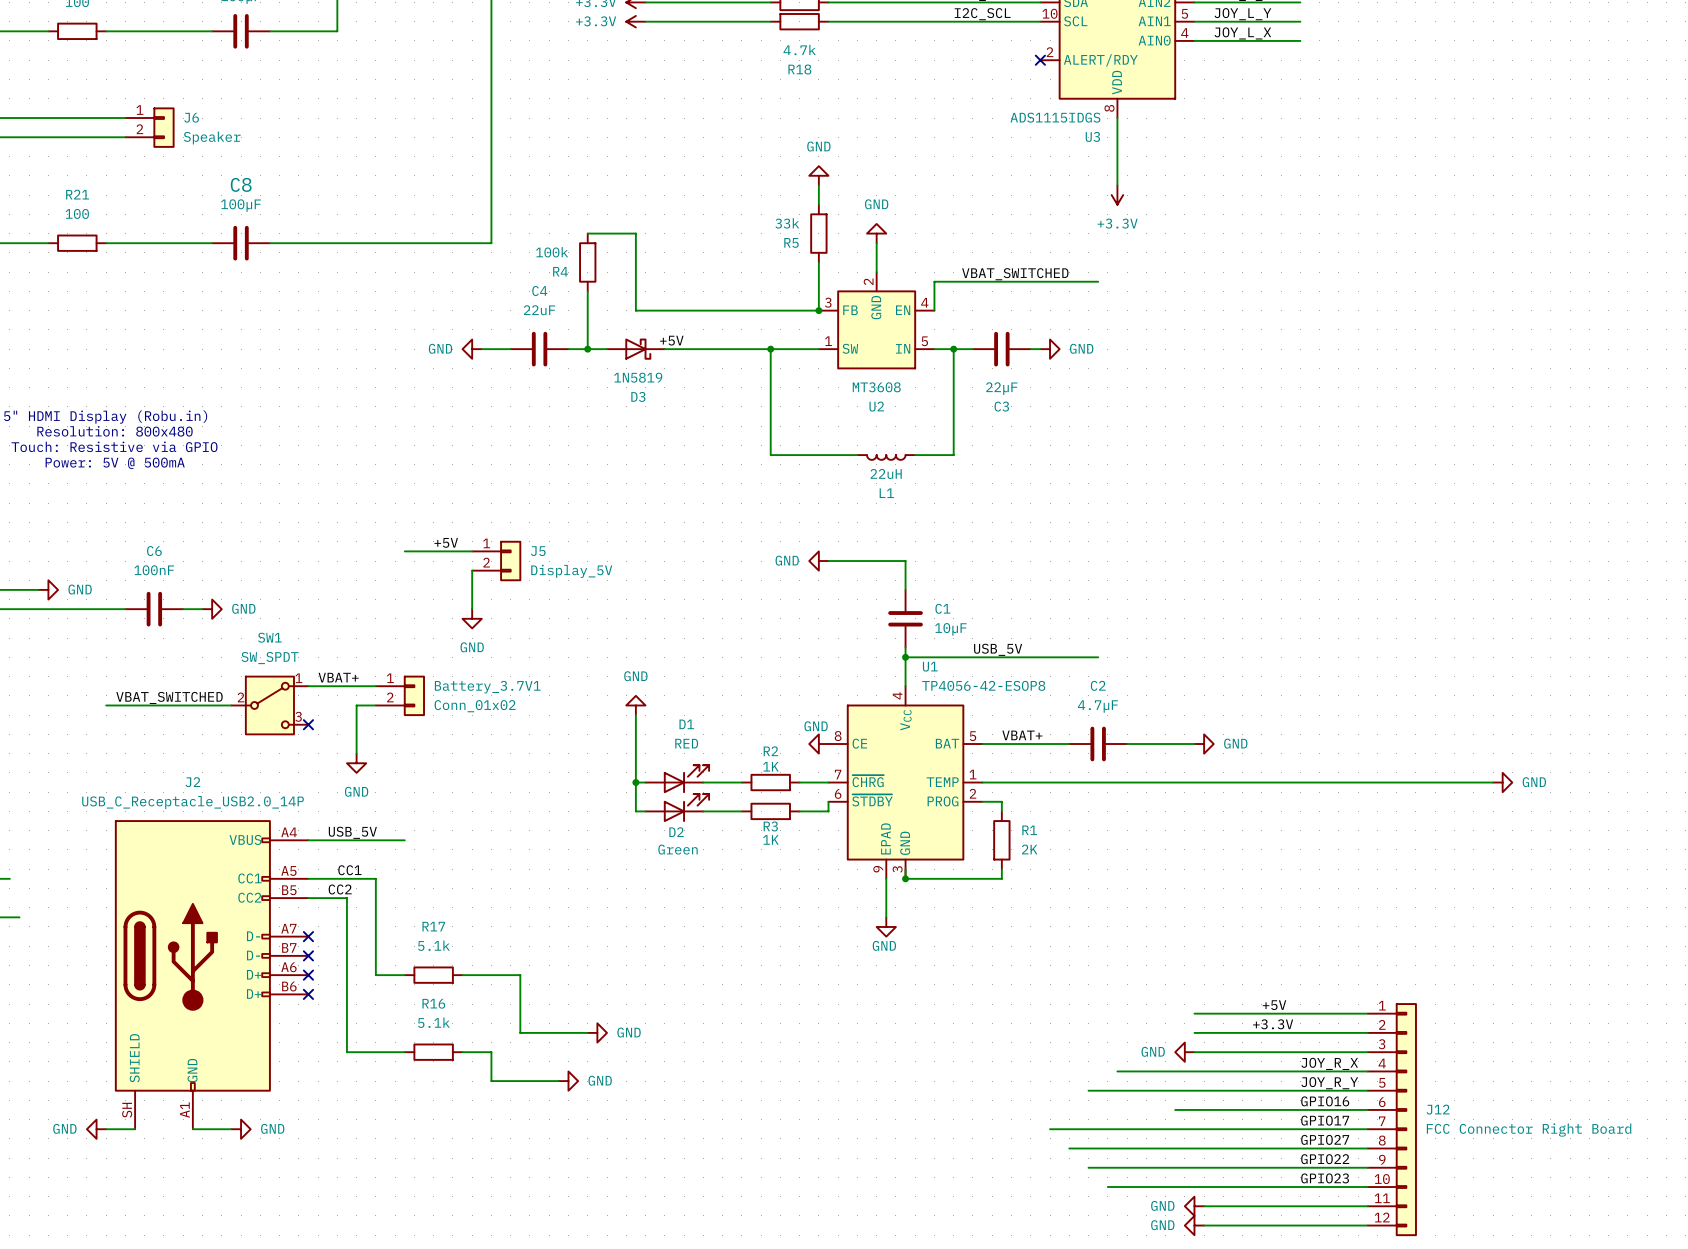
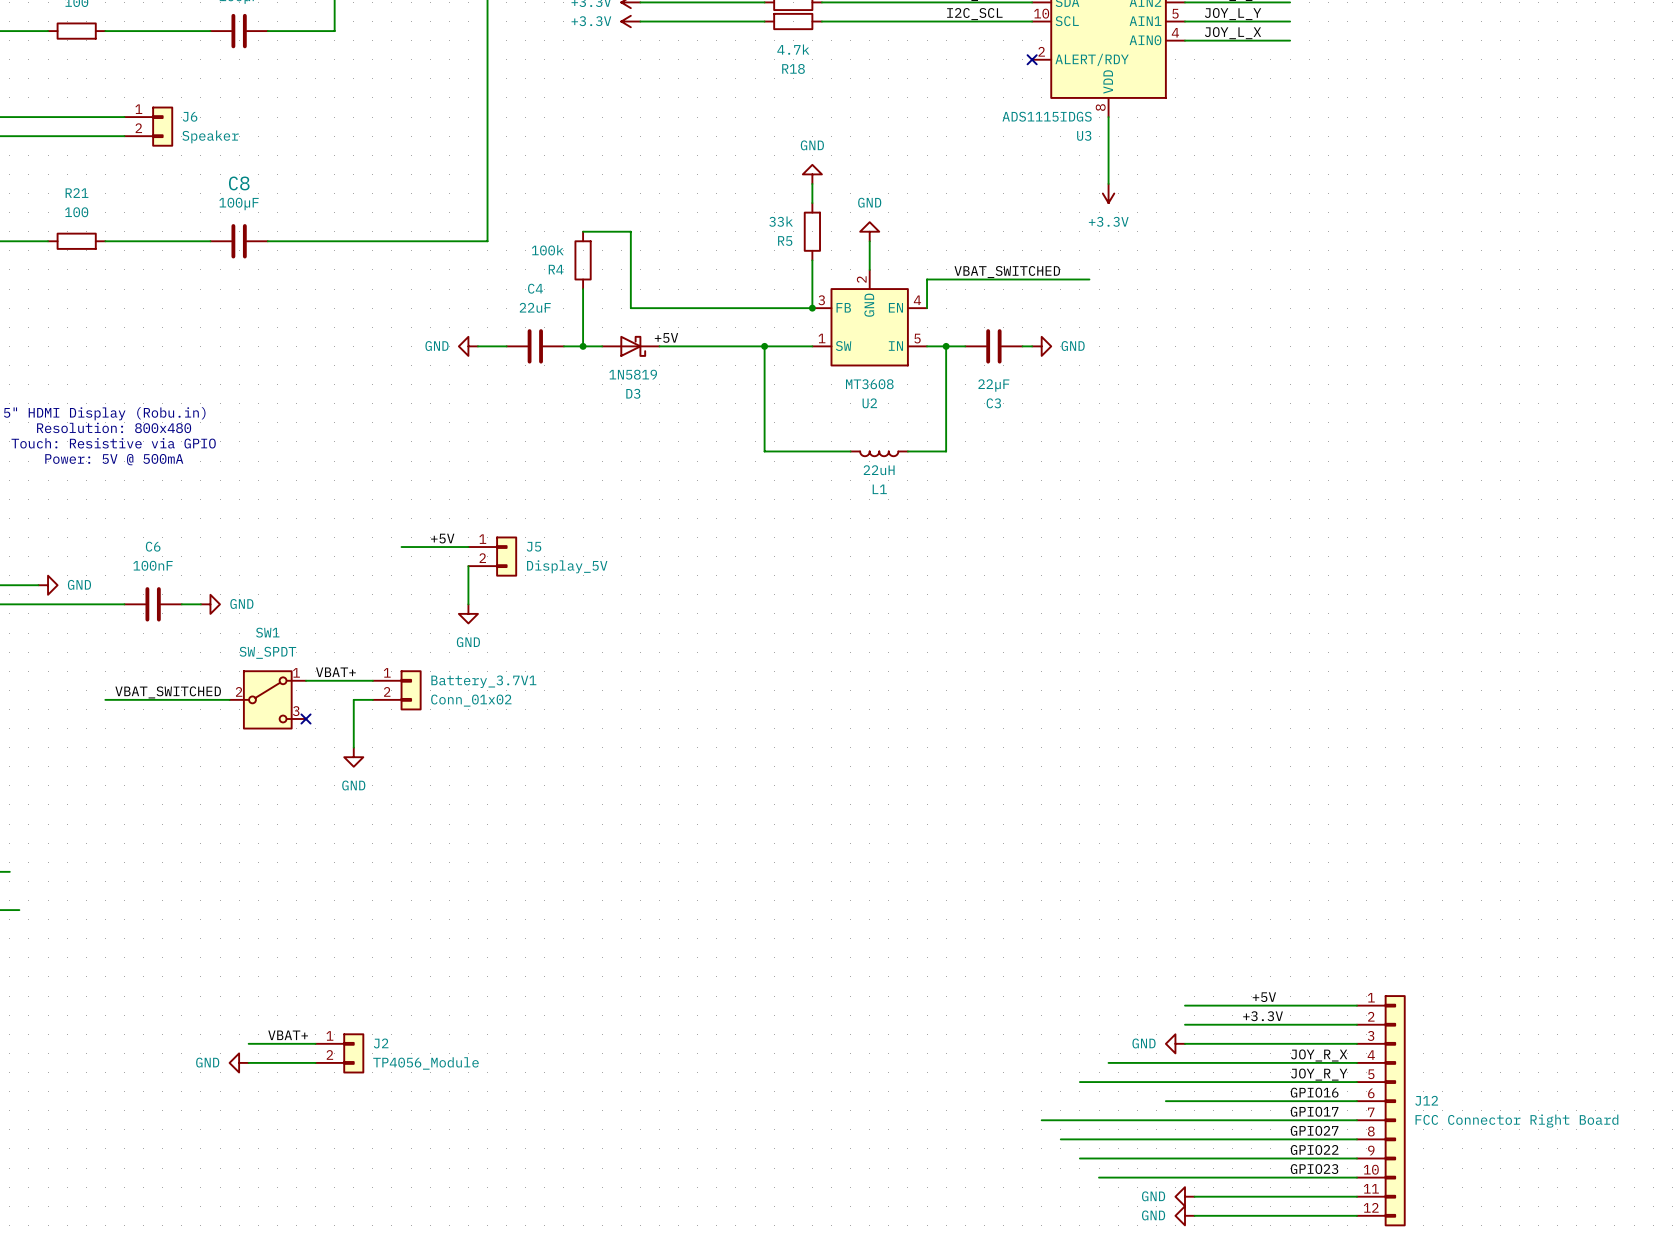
power symbol: GND (818, 561) -> none
wire: (828, 561) (905, 561) (905, 589) -> none
C1: 10µF (905, 618) -> none
wire: (905, 647) (905, 686) -> none
label: USB_5V (998, 649) -> none
wire: (905, 657) (1098, 657) -> none
junction: (905, 657) -> none
power symbol: GND (635, 705) -> none
wire: (635, 715) (635, 811) (645, 811) -> none
label: VBAT+ (1022, 735) -> none
power symbol: GND (818, 744) -> none
wire: (982, 744) (1069, 744) -> none
C2: 4.7µF (1098, 744) -> none
wire: (1127, 744) (1194, 744) -> none
power symbol: GND (1204, 744) -> none
D1: RED (677, 779) -> none
J2 name position: J2 (192, 782) -> J2 (381, 1043)
wire: (635, 782) (645, 782) -> none
junction: (635, 782) -> none
wire: (703, 782) (741, 782) -> none
R2: 1K (770, 782) -> none
wire: (799, 782) (828, 782) -> none
U1: TP4056-42-ESOP8 (905, 782) -> none
wire: (982, 782) (1493, 782) -> none
power symbol: GND (1502, 782) -> none
wire: (828, 801) (828, 811) (799, 811) -> none
wire: (982, 801) (1001, 801) (1001, 811) -> none
J2 value: USB_C_Receptacle_USB2.0_14P (193, 802) -> TP4056_Module (425, 1063)
D2: Green (677, 808) -> none
wire: (703, 811) (741, 811) -> none
R3: 1K (770, 811) -> none
J2 symbol: [114, 820, 309, 1130] -> [315, 1033, 365, 1074]
label: USB_5V (352, 832) -> none
wire: (308, 840) (404, 840) -> none
R1: 2K (1001, 840) -> none
wire: (905, 869) (905, 878) (1001, 878) (1001, 869) -> none
label: CC1 (349, 870) -> none
wire: (308, 878) (375, 878) (375, 975) (404, 975) -> none
wire: (886, 878) (886, 917) -> none
junction: (905, 878) -> none
label: CC2 (340, 889) -> none
wire: (308, 898) (346, 898) (346, 1052) (404, 1052) -> none
power symbol: GND (886, 926) -> none
no-connect mark: (308, 936) -> none
no-connect mark: (308, 955) -> none
no-connect mark: (308, 975) -> none
R17: 5.1k (433, 975) -> none
wire: (462, 975) (520, 975) (520, 1032) (587, 1032) -> none
no-connect mark: (308, 994) -> none
power symbol: GND (597, 1032) -> none
label: none -> VBAT+ (288, 1035)
wire: none -> (248, 1043) (315, 1043)
R16: 5.1k (433, 1052) -> none
wire: (462, 1052) (491, 1052) (491, 1081) (558, 1081) -> none
wire: none -> (248, 1062) (315, 1062)
power symbol: GND (568, 1081) -> none
power symbol: GND (96, 1129) -> none
wire: (106, 1129) (135, 1129) -> none
wire: (192, 1129) (231, 1129) -> none
power symbol rotation: 0° (241, 1129) -> 180° (239, 1062)
power symbol position: GND (241, 1129) -> GND (239, 1062)

